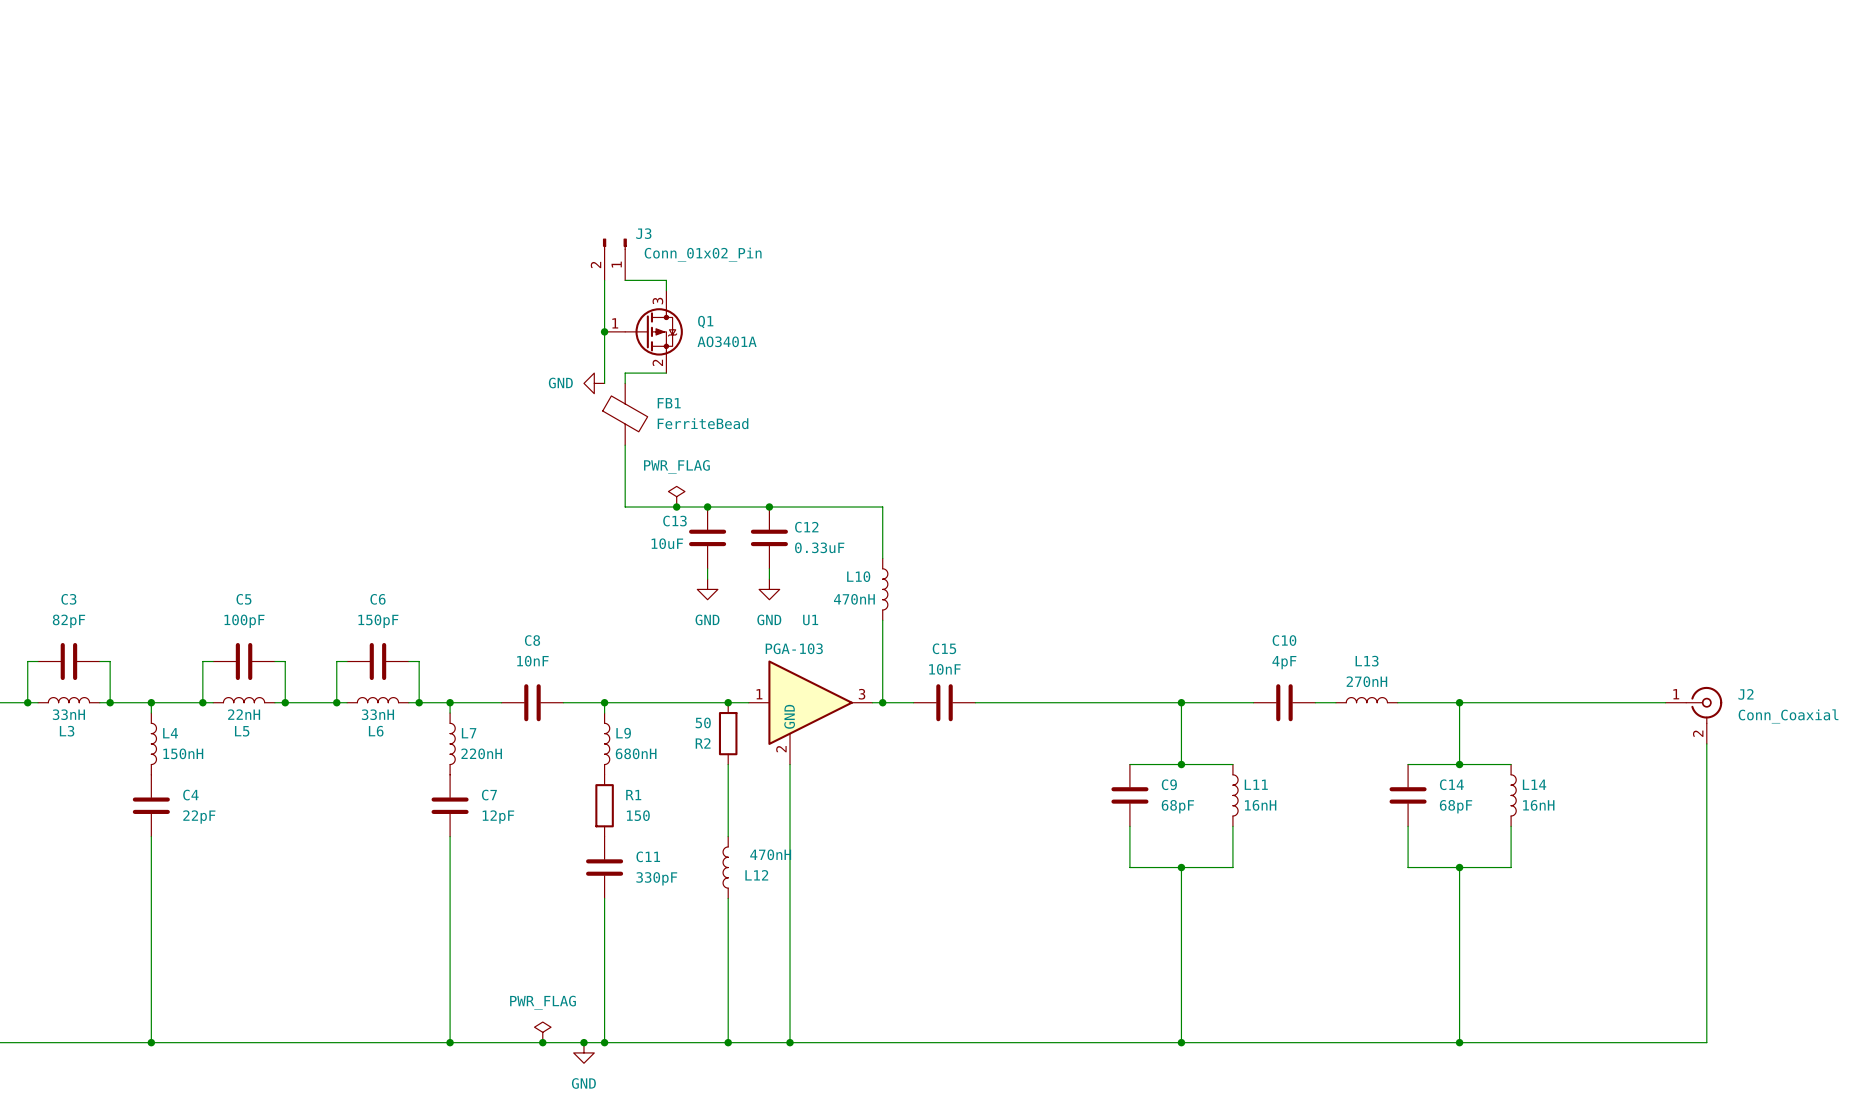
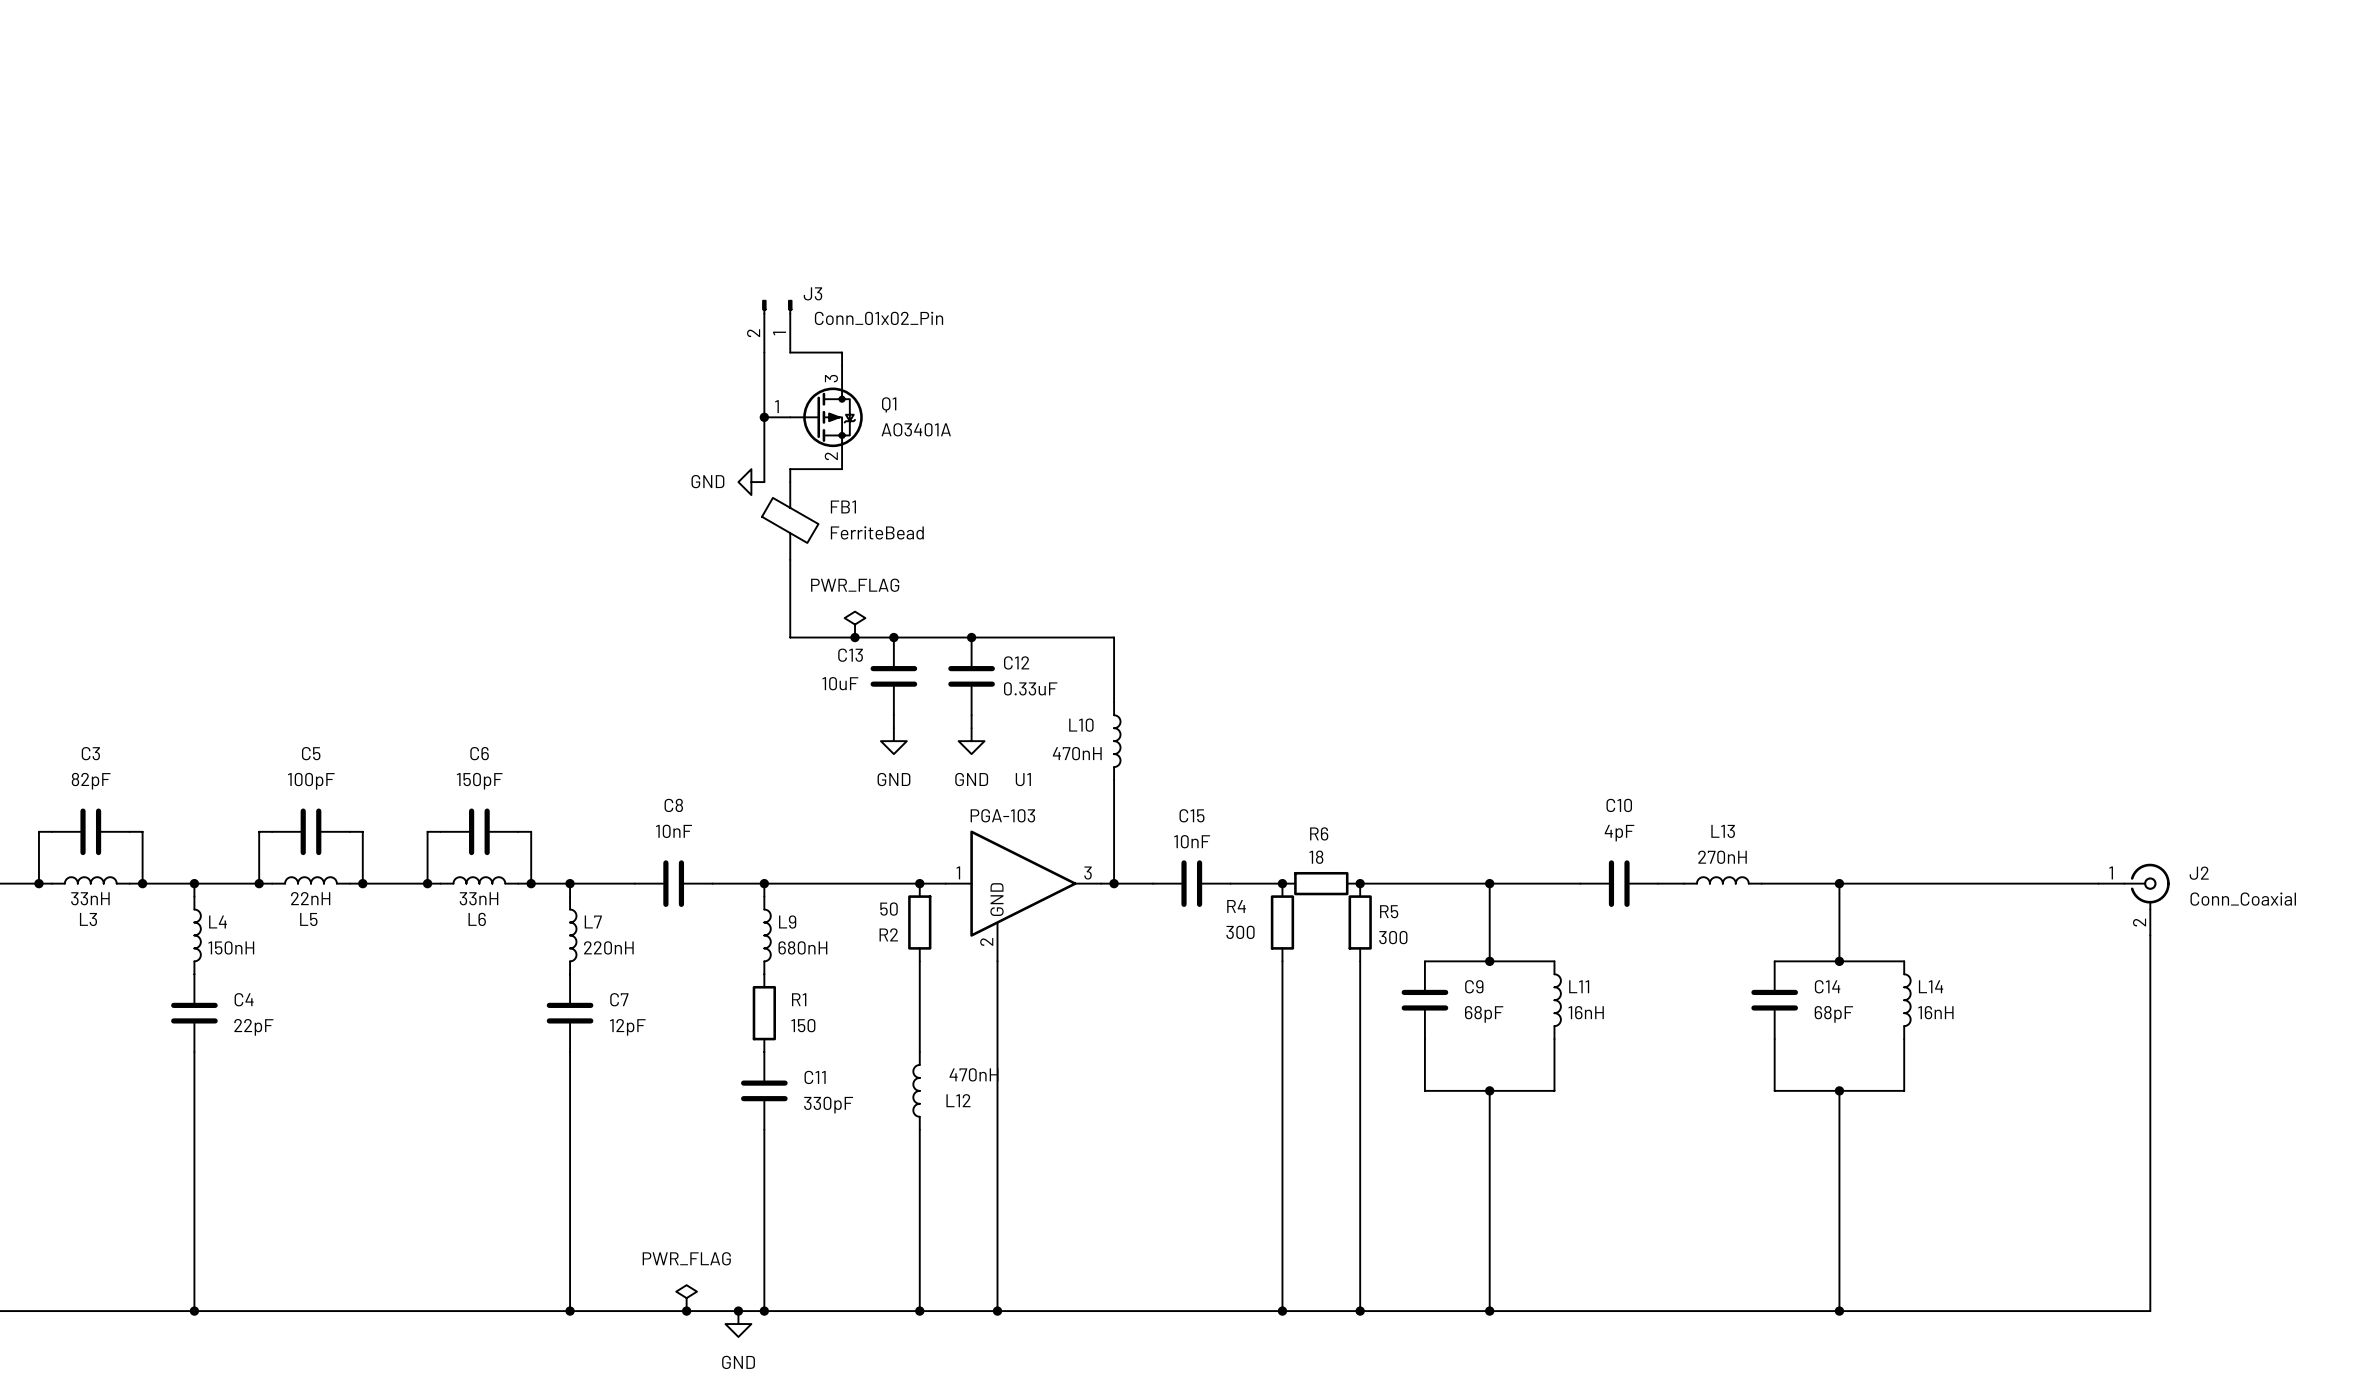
wire: (1016, 702) (1078, 702) -> none
junction: none -> (1282, 883)
R6: none -> 18 (1321, 883)
junction: none -> (1360, 883)
R4: none -> 300 (1282, 922)
R5: none -> 300 (1360, 922)
wire: none -> (1282, 961) (1282, 1311)
wire: none -> (1360, 961) (1360, 1311)
junction: none -> (1282, 1311)
junction: none -> (1360, 1311)

